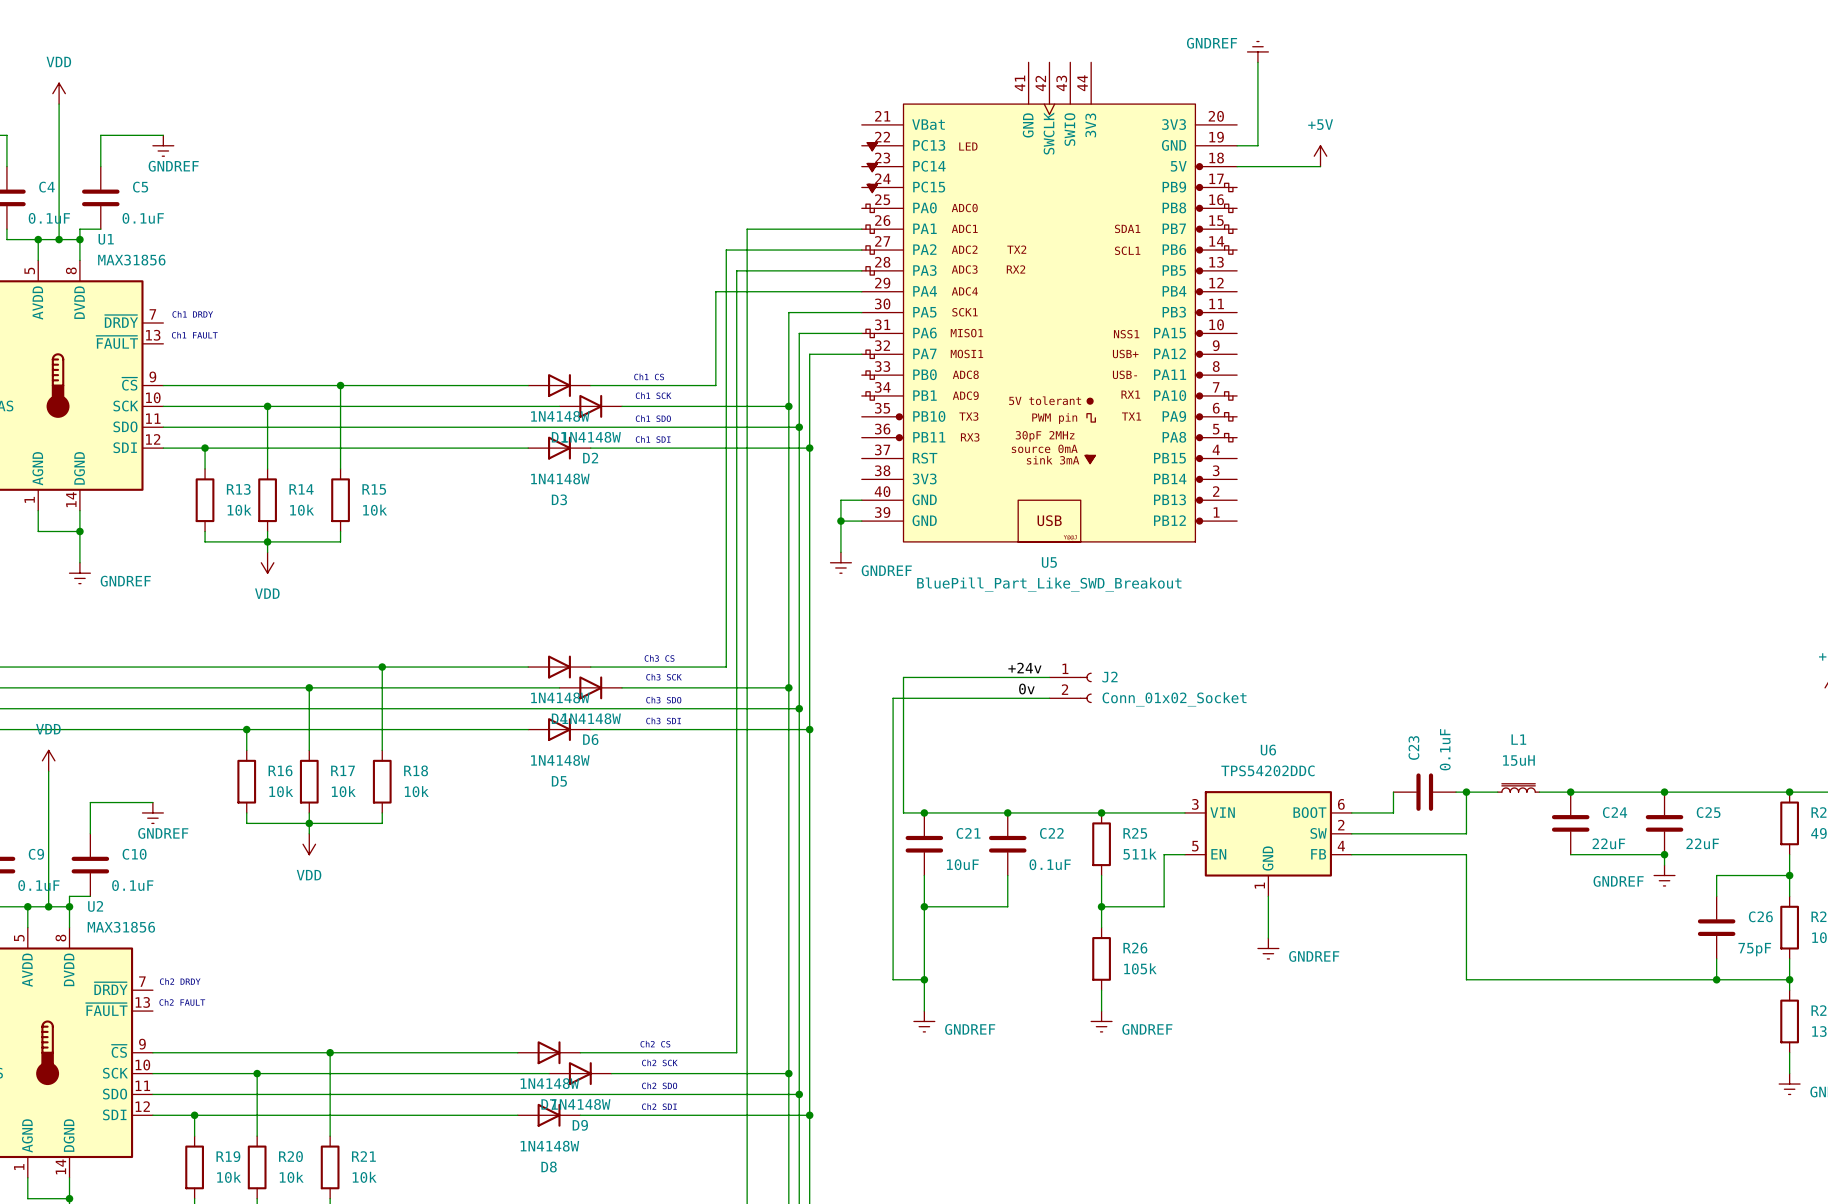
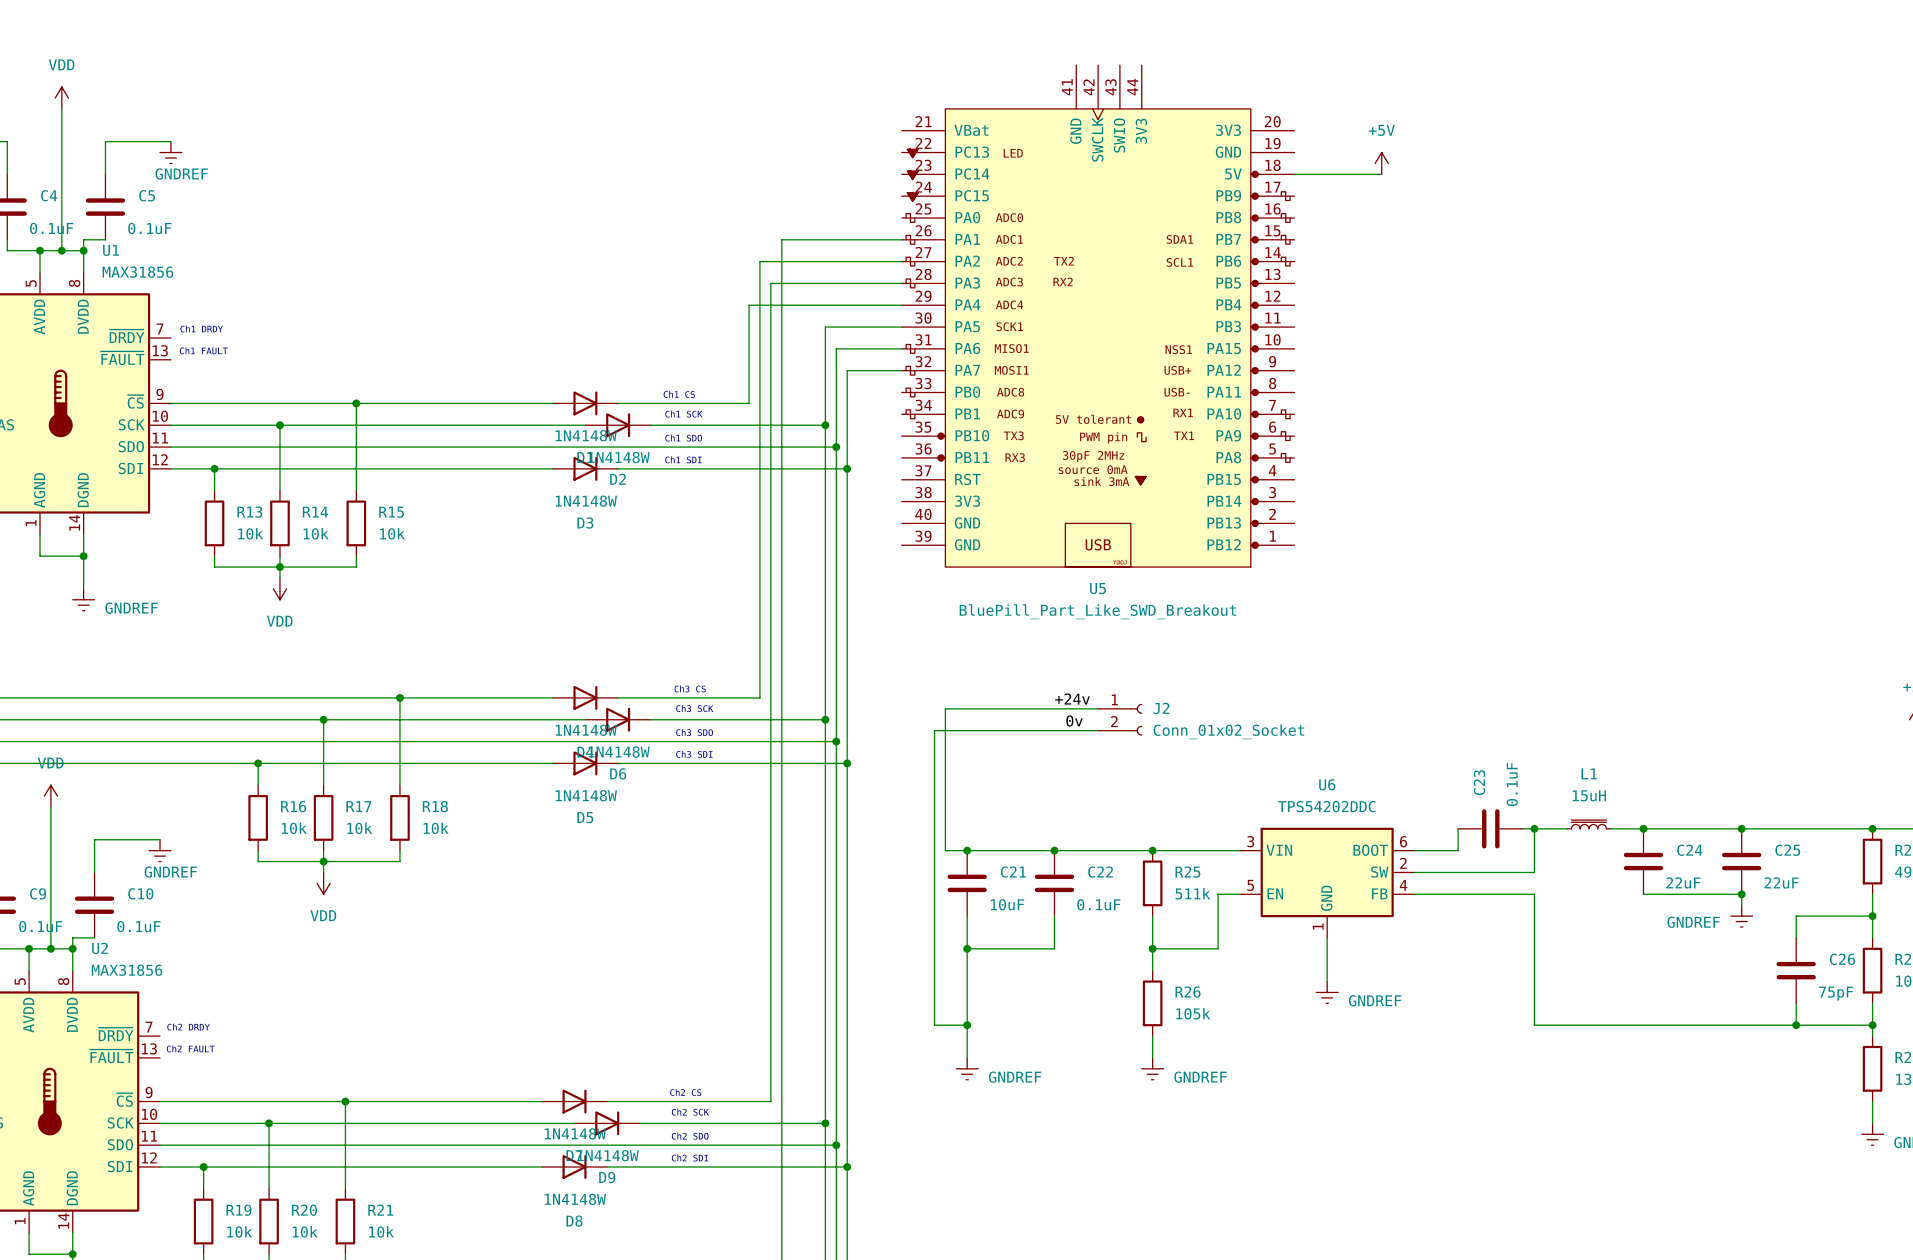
power symbol: GNDREF (1257, 51) -> none
wire: (1257, 62) (1257, 145) (1237, 145) -> none
wire: (861, 500) (840, 500) (840, 552) -> none
wire: (840, 521) (861, 521) -> none
junction: (840, 521) -> none
power symbol: GNDREF (840, 562) -> none

